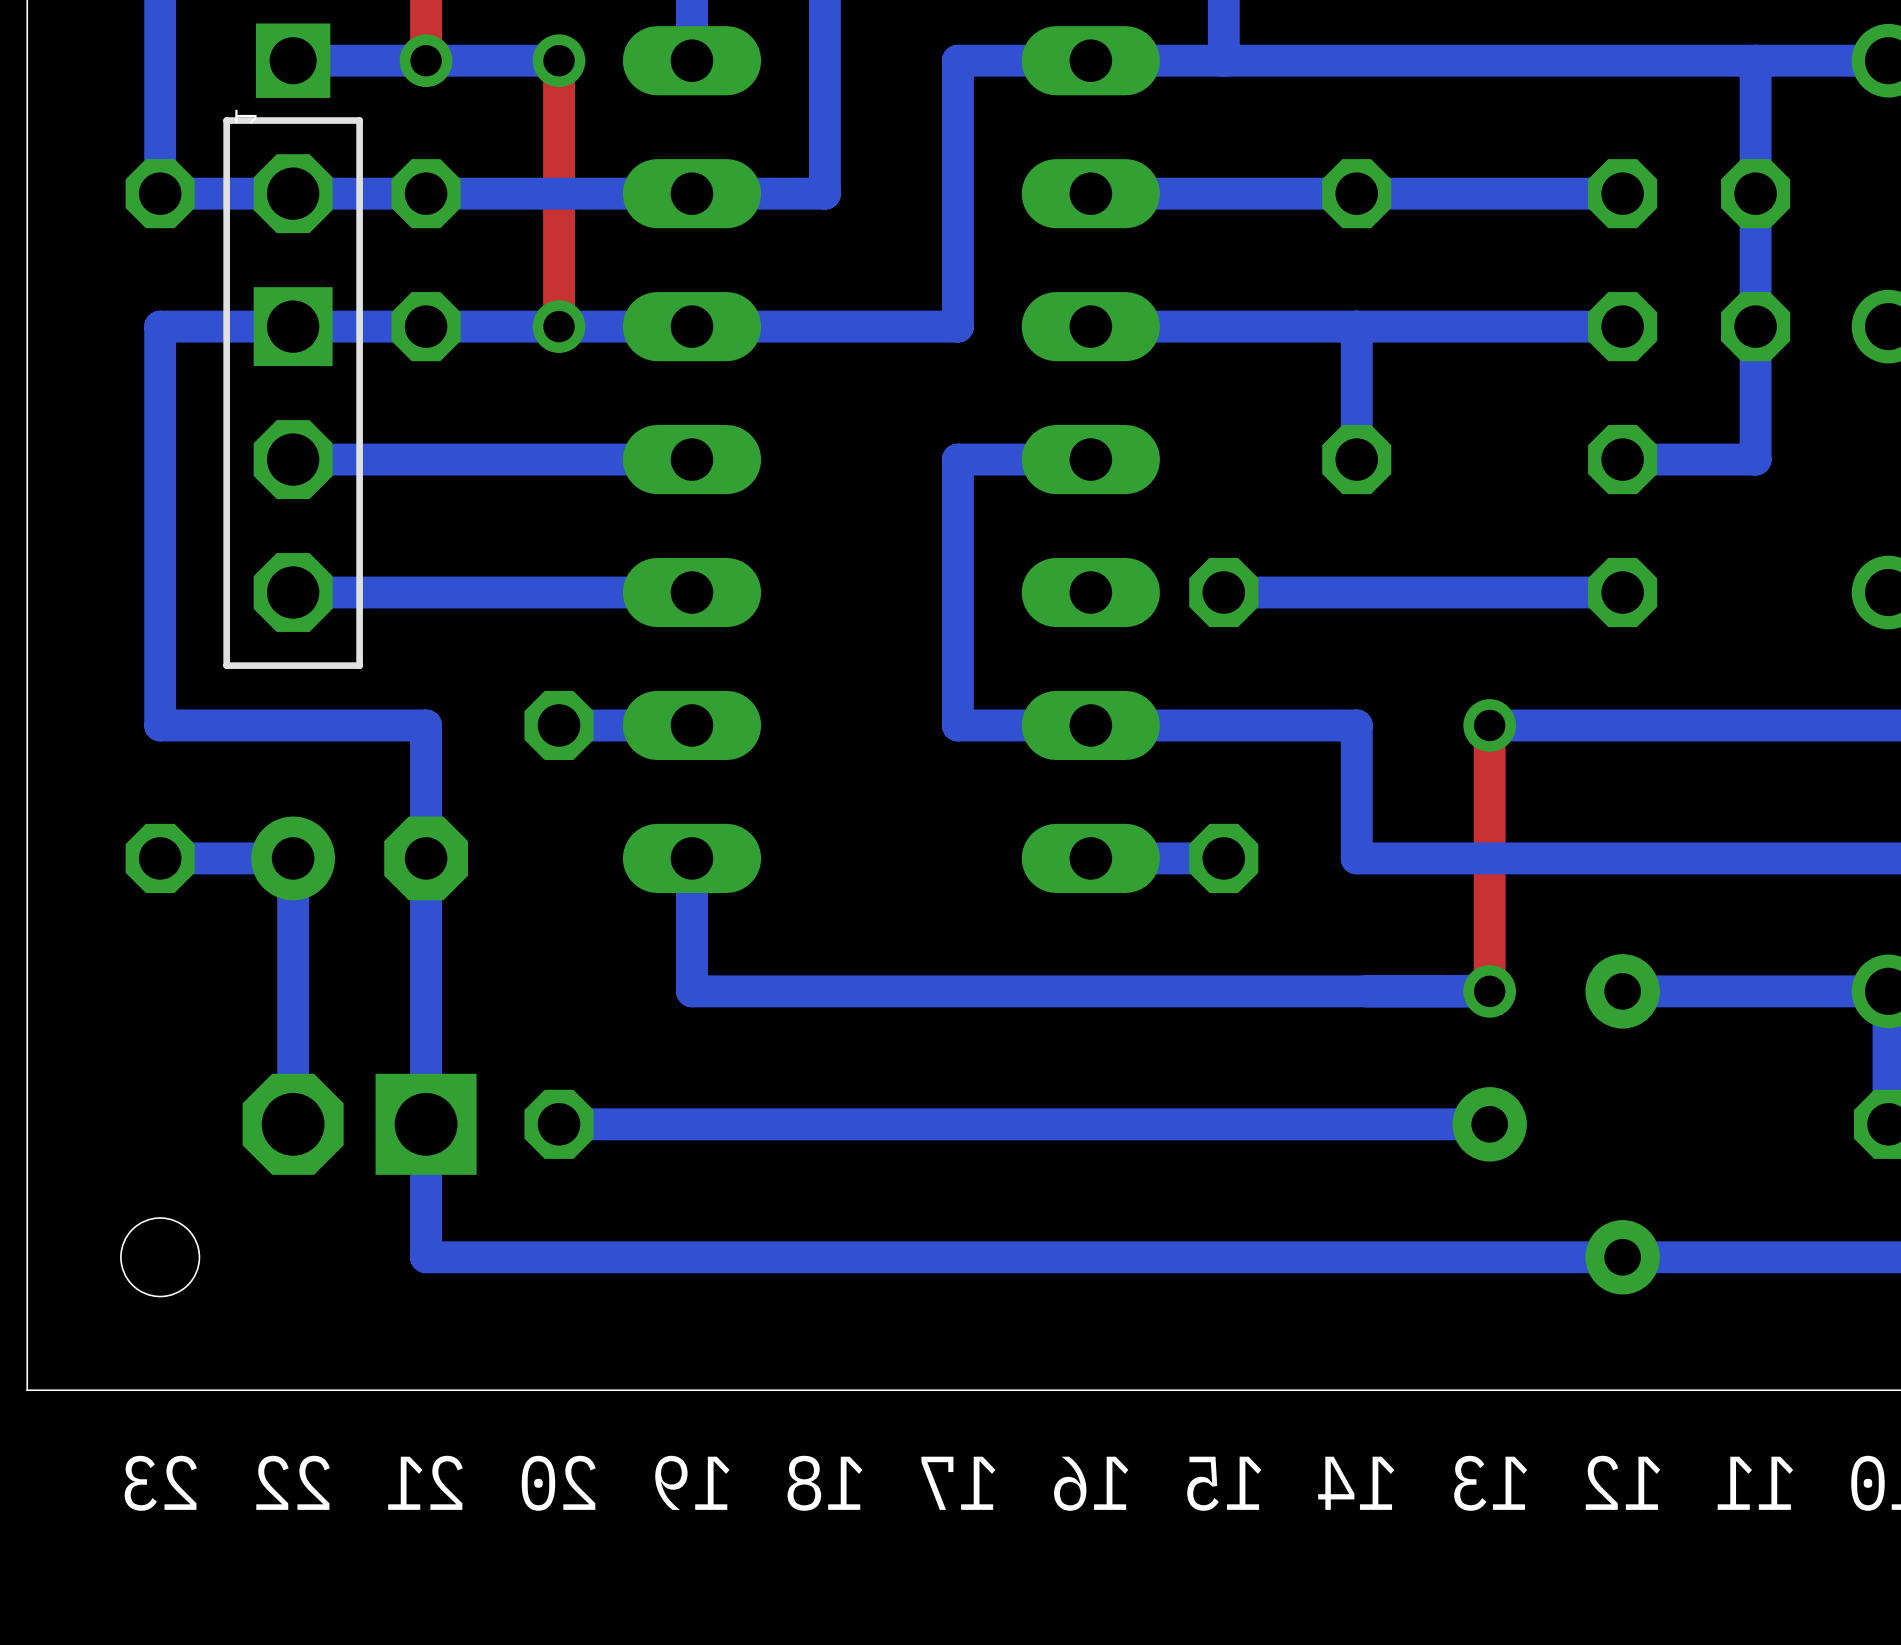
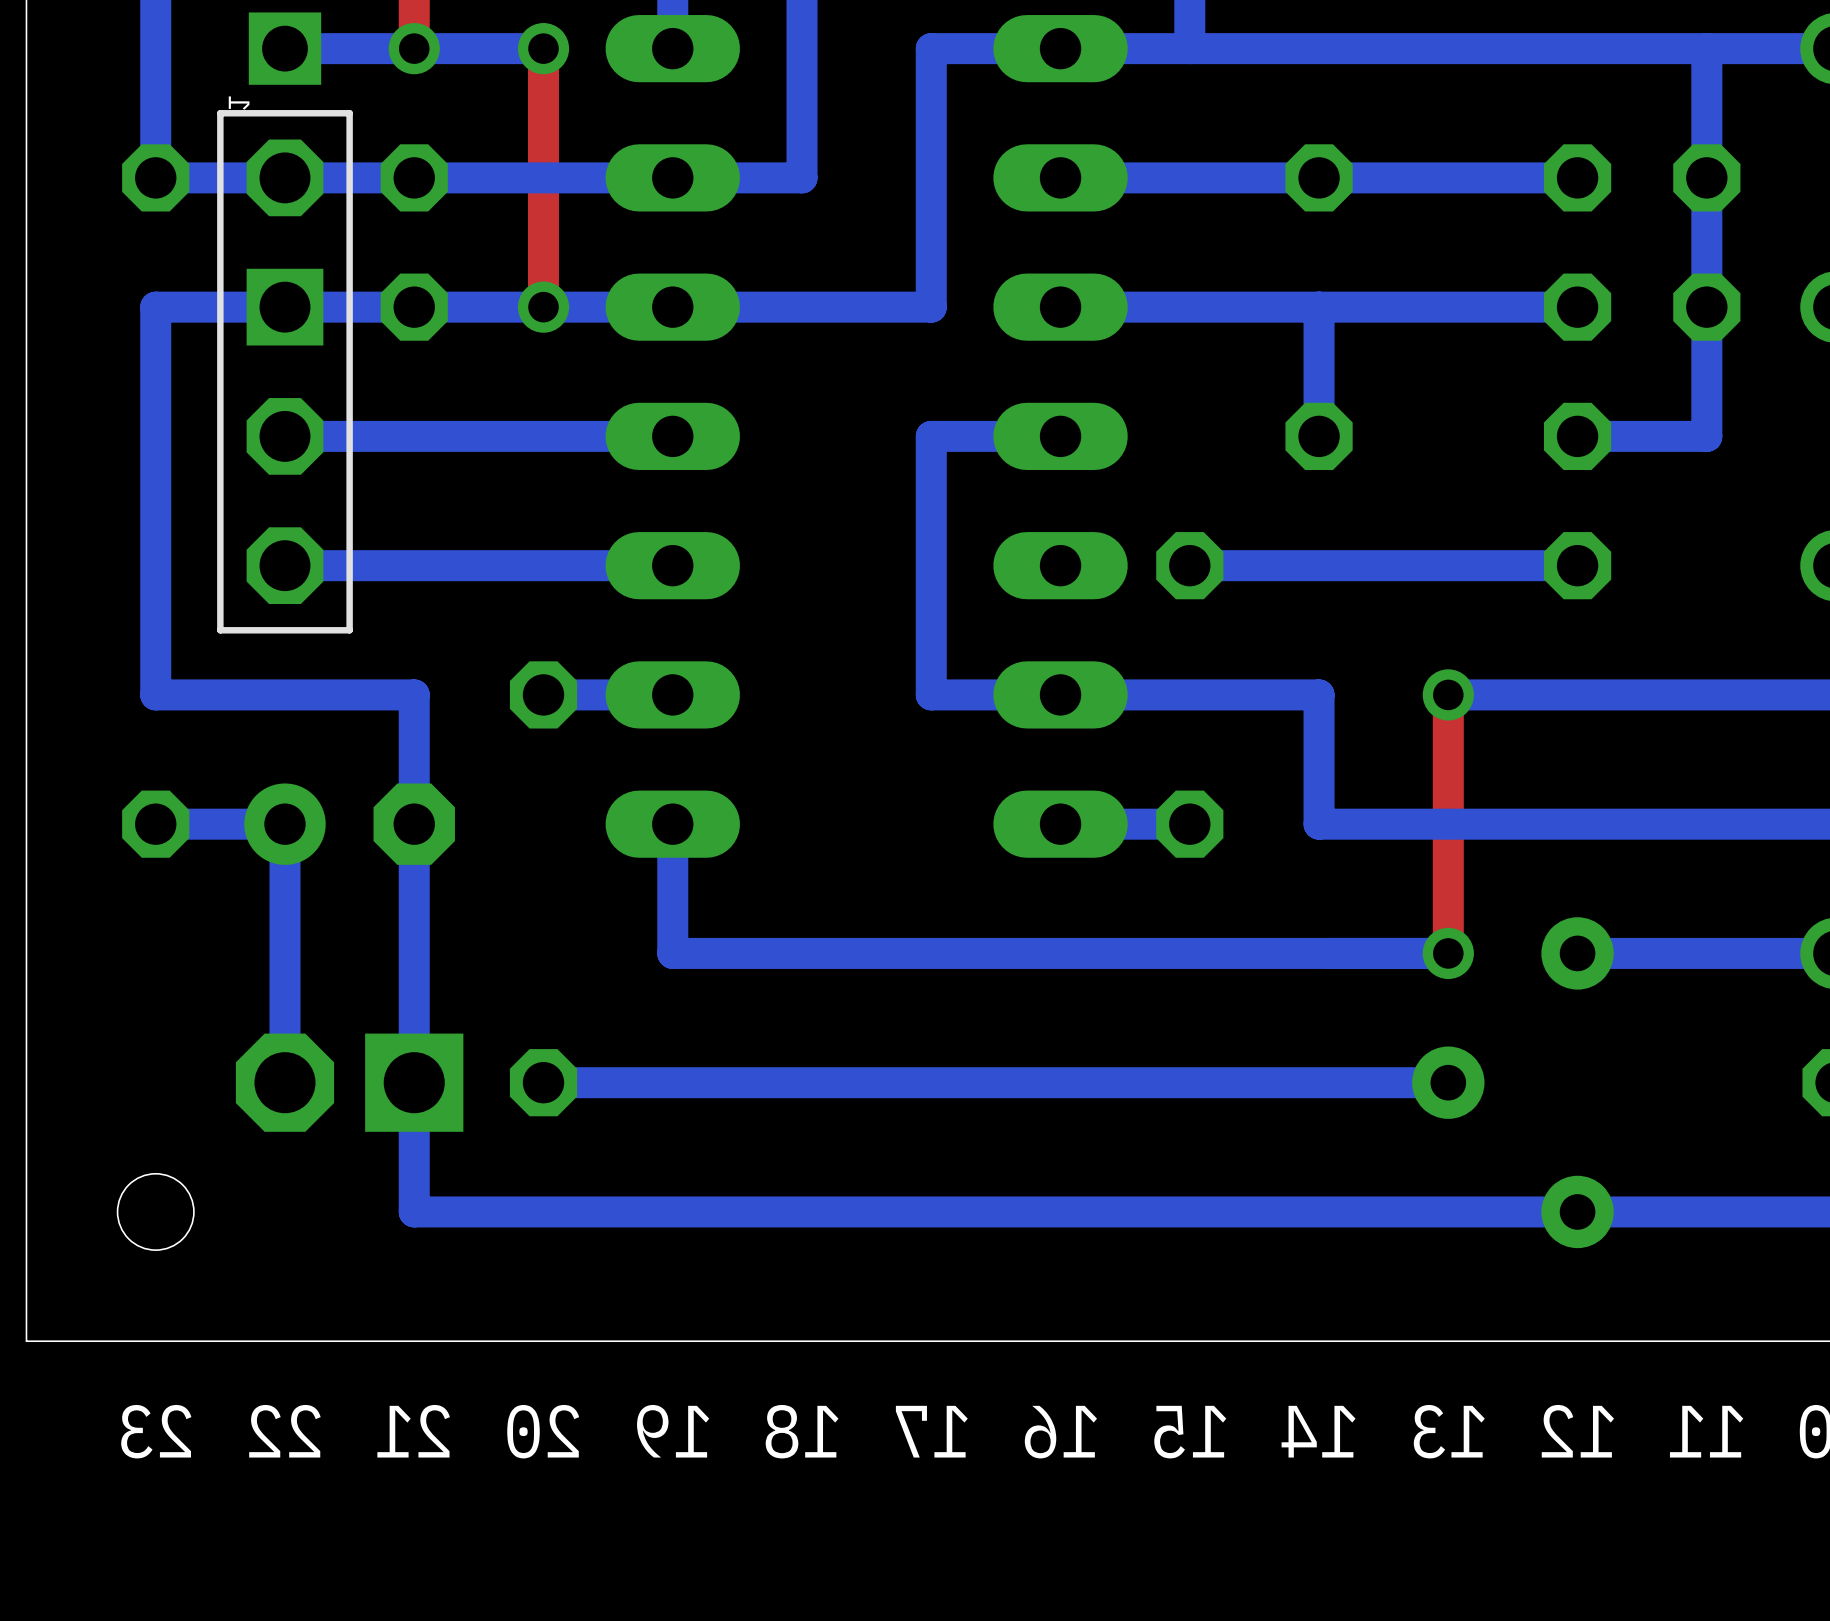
part footprint: [223, 117, 363, 669] -> [217, 110, 353, 634]

